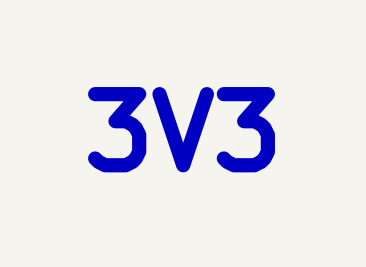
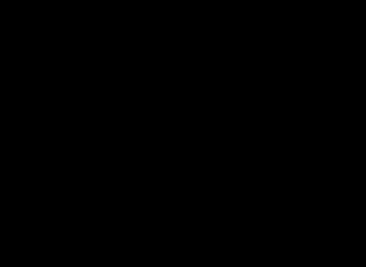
text: 3V3 (181, 129) -> none

